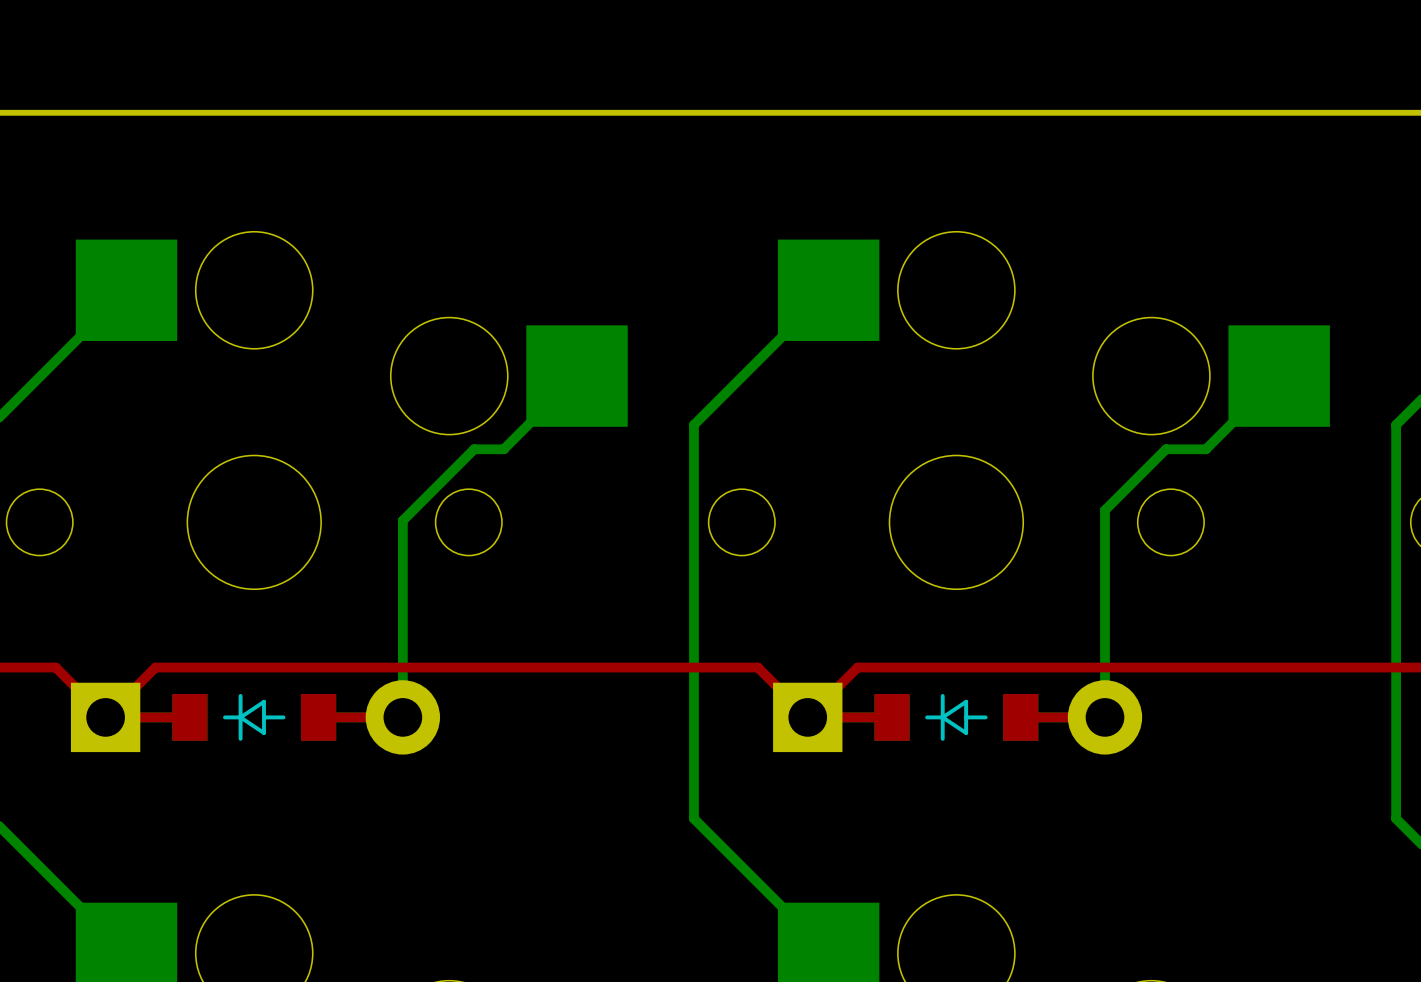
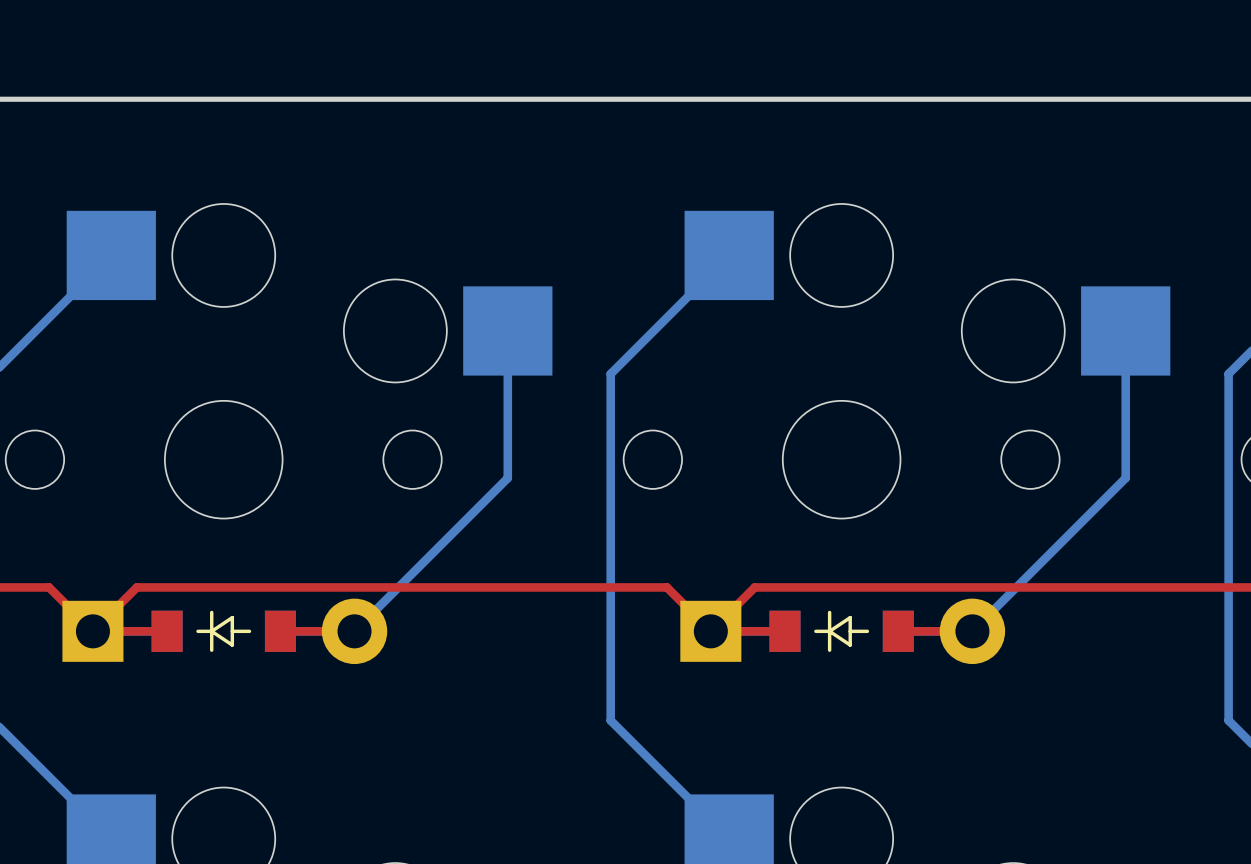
bottom track: (577, 376) (503, 449) (474, 449) (402, 520) (402, 717) -> (507, 330) (507, 478) (354, 631)
bottom track: (1279, 376) (1205, 449) (1166, 449) (1104, 510) (1104, 717) -> (1125, 330) (1125, 478) (972, 631)

